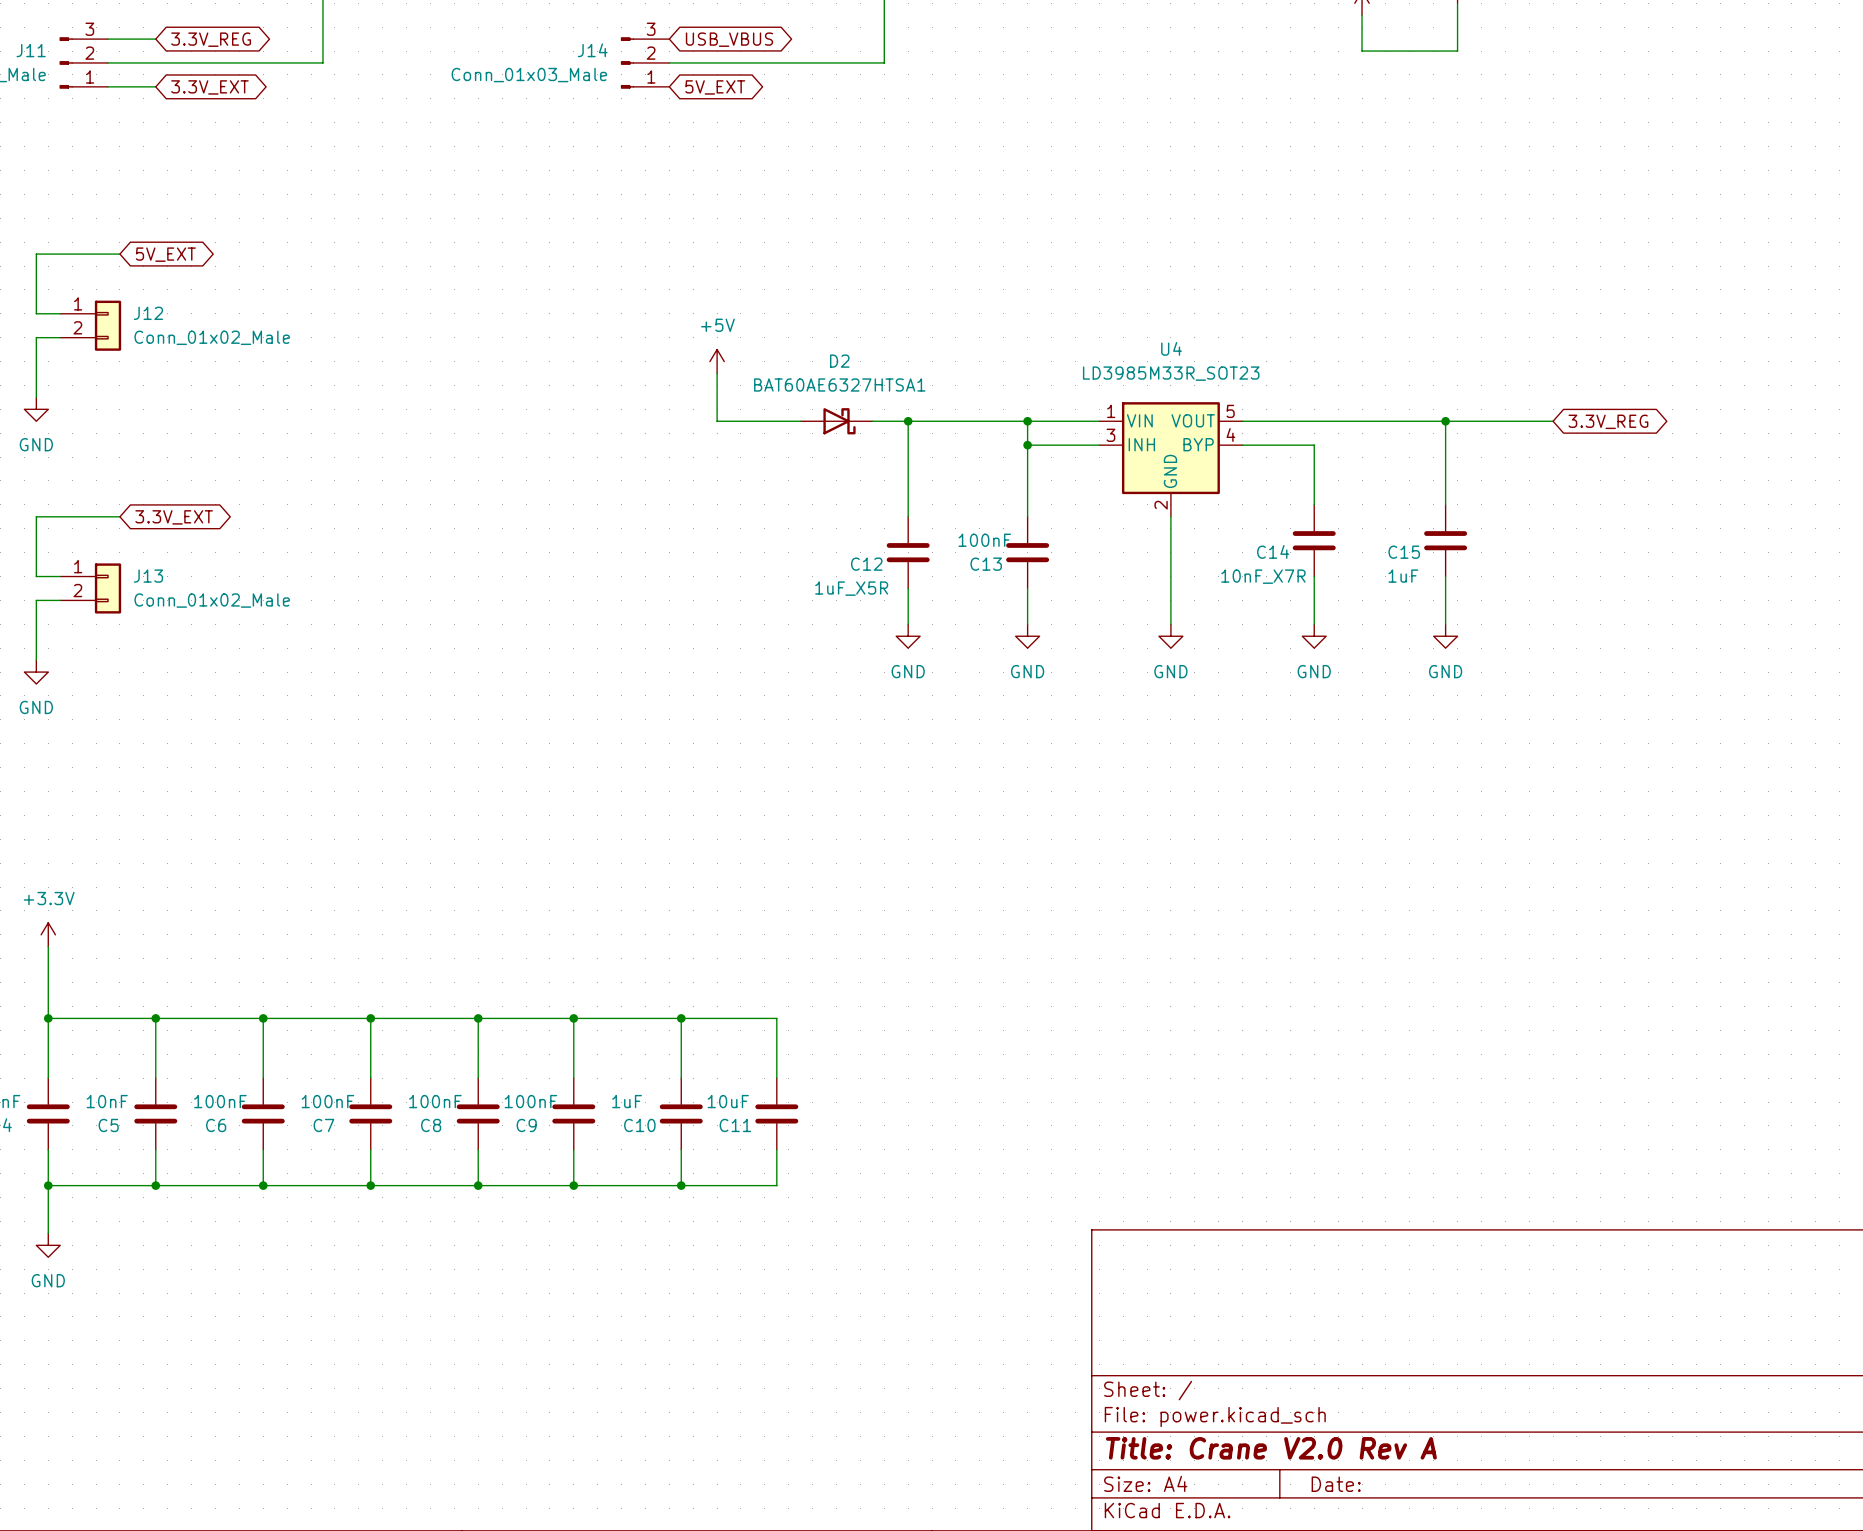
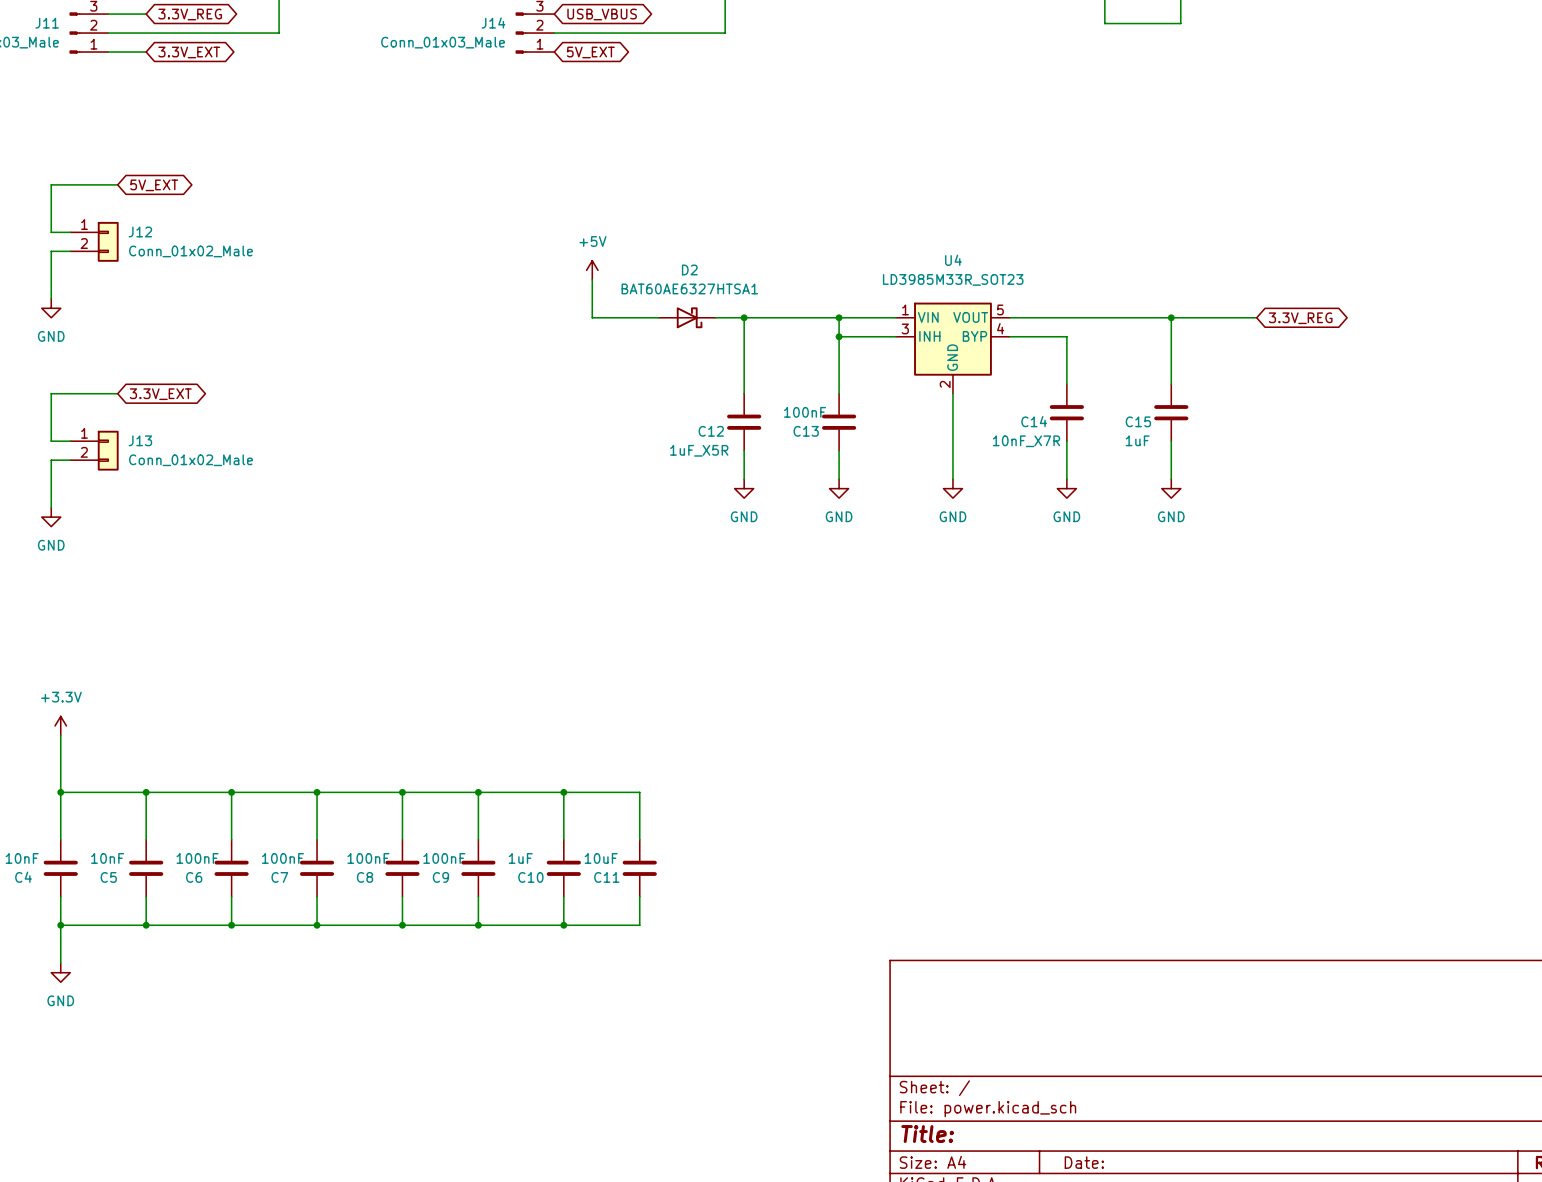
title block: Title: Crane V2.0 Rev A (1271, 1448) -> Title: (927, 1134)

